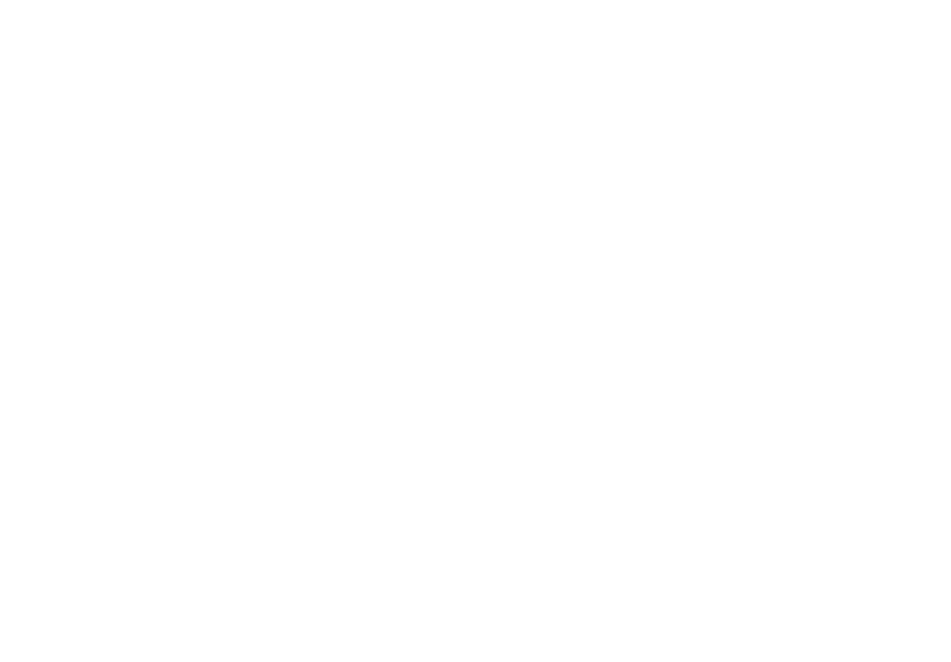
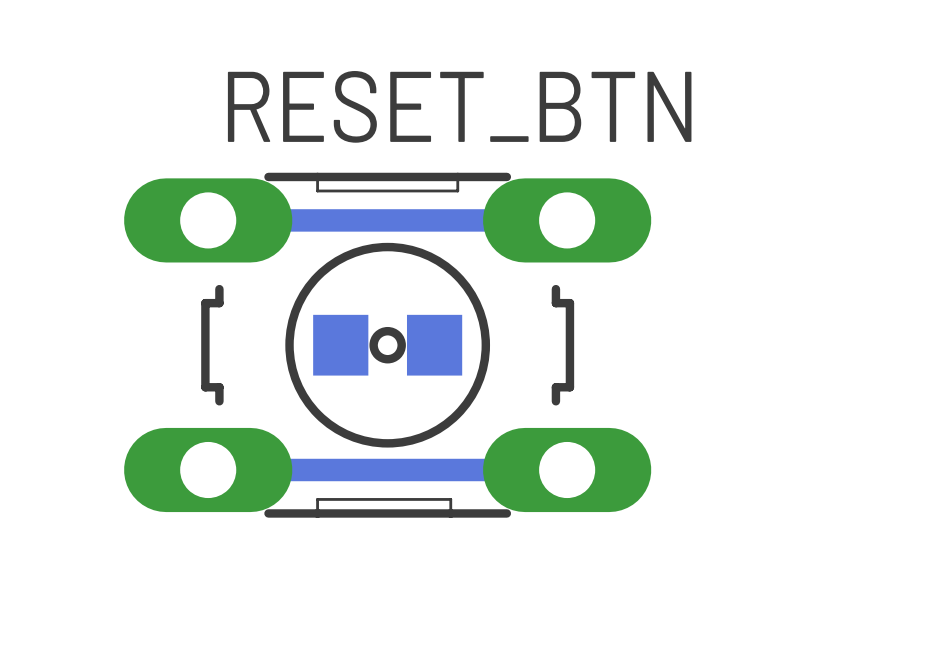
bottom track: none -> (208, 220) (567, 220)
RESET_BTN: none -> (387, 345)
part: none -> (387, 345)
bottom track: none -> (208, 470) (567, 470)

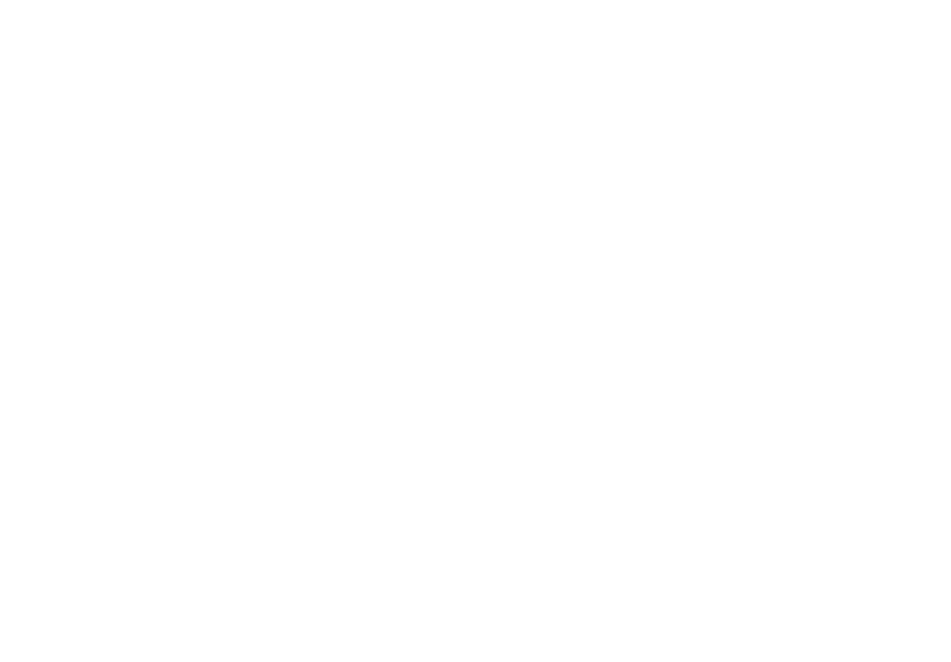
bottom track: (208, 220) (567, 220) -> none
RESET_BTN: (387, 345) -> none
part: (387, 345) -> none
bottom track: (208, 470) (567, 470) -> none

